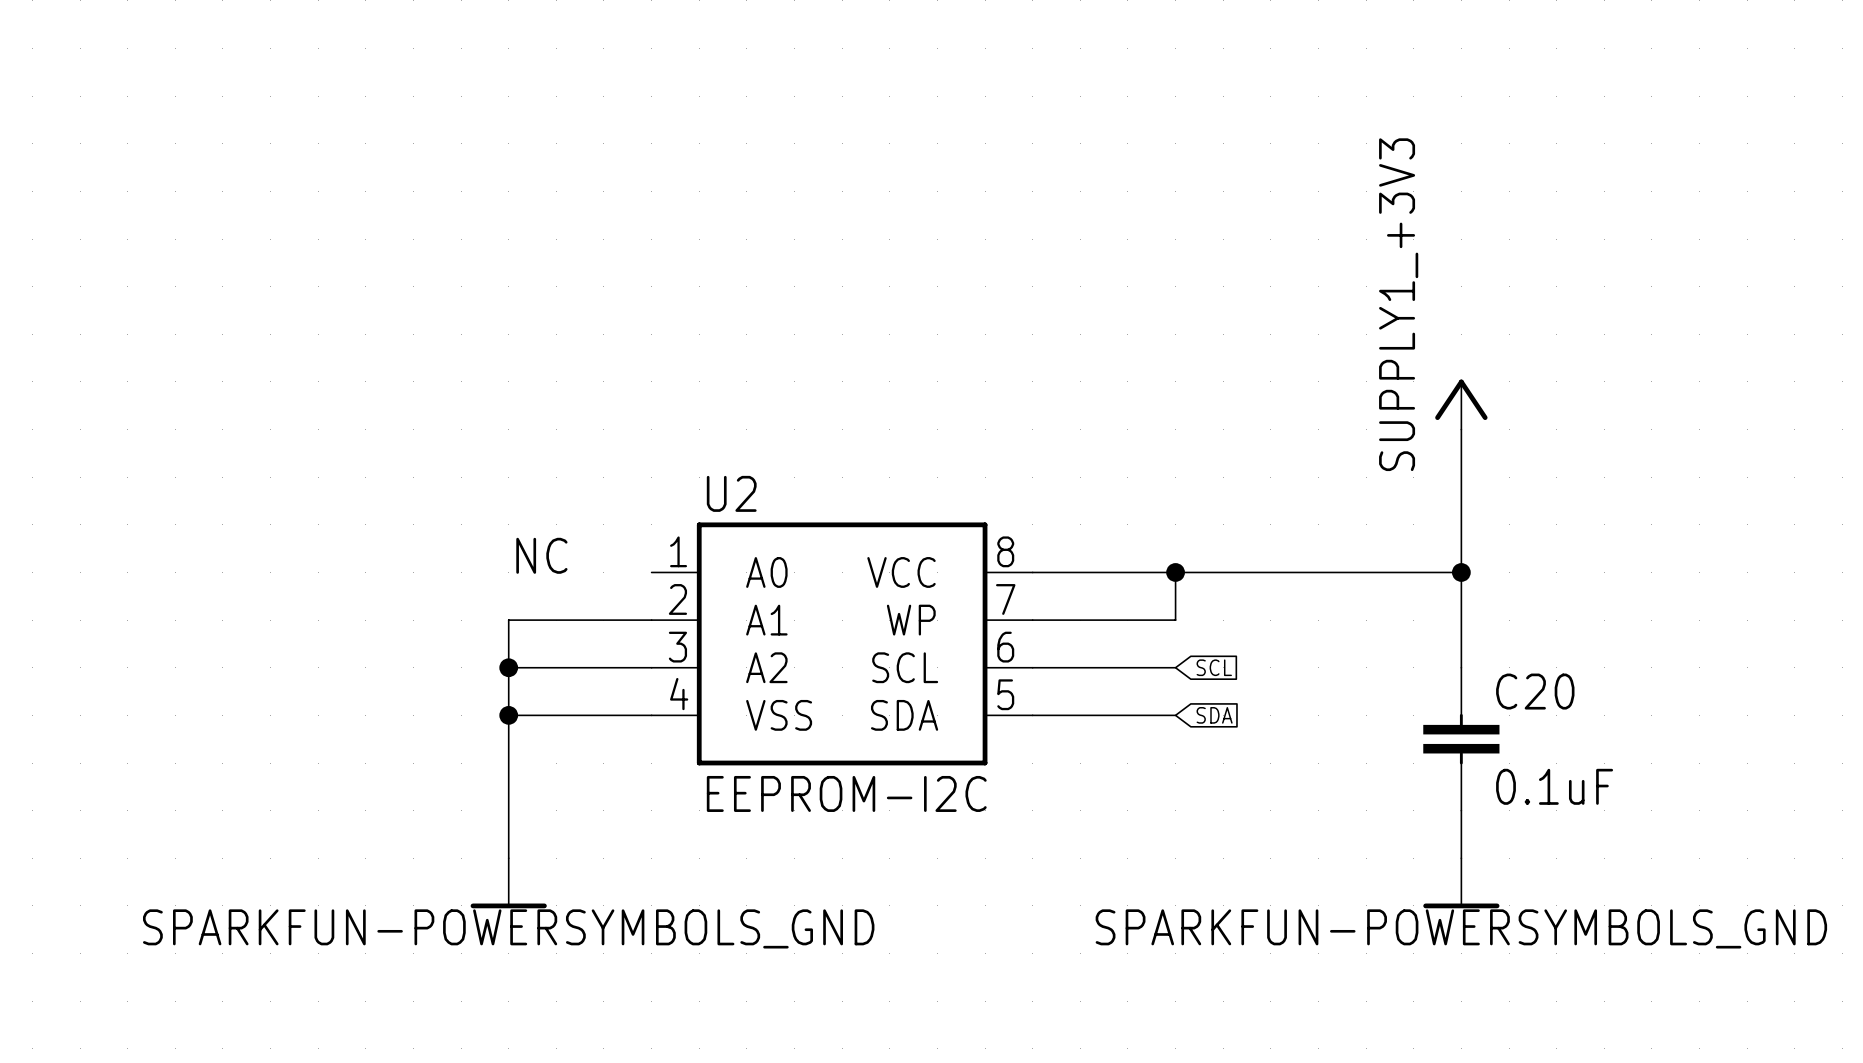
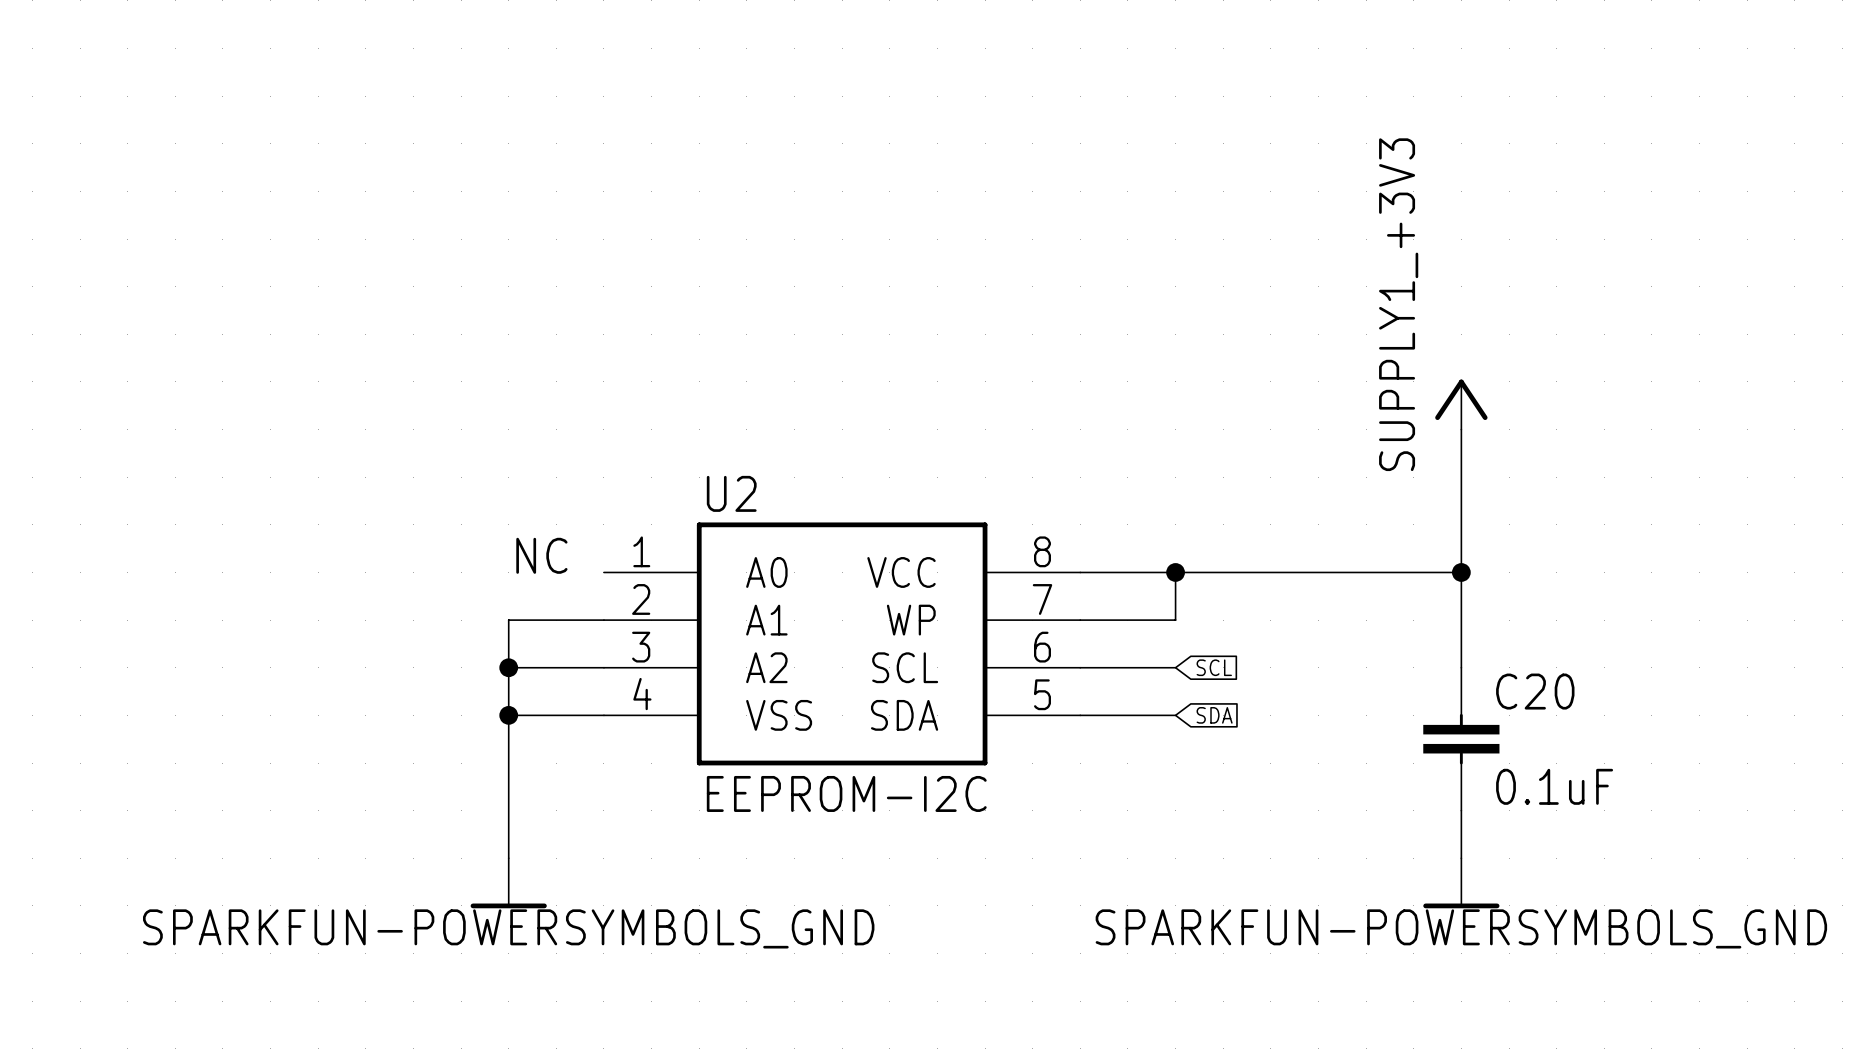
U2 symbol: [651, 522, 1033, 766] -> [603, 522, 1081, 766]

